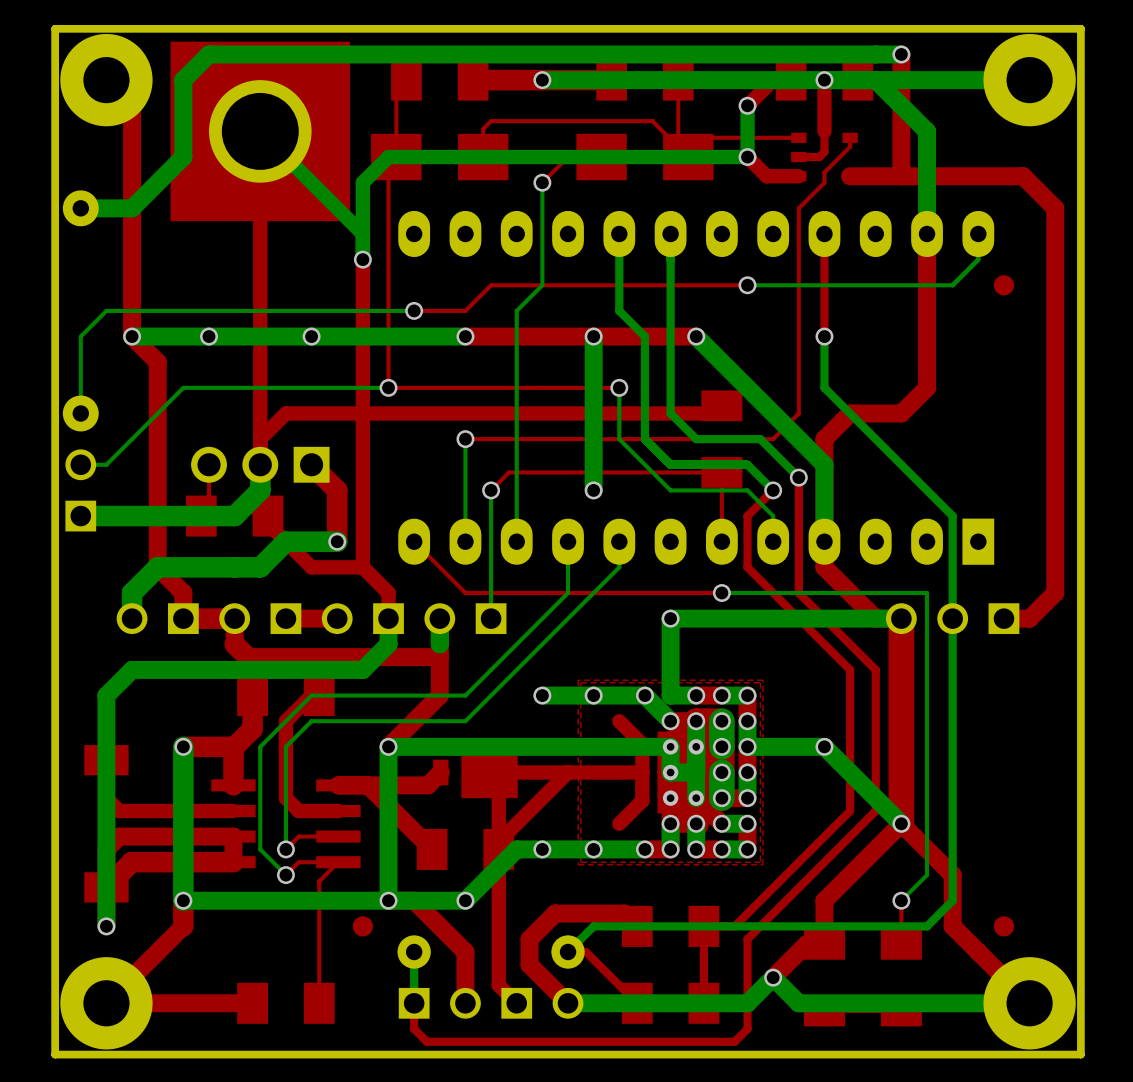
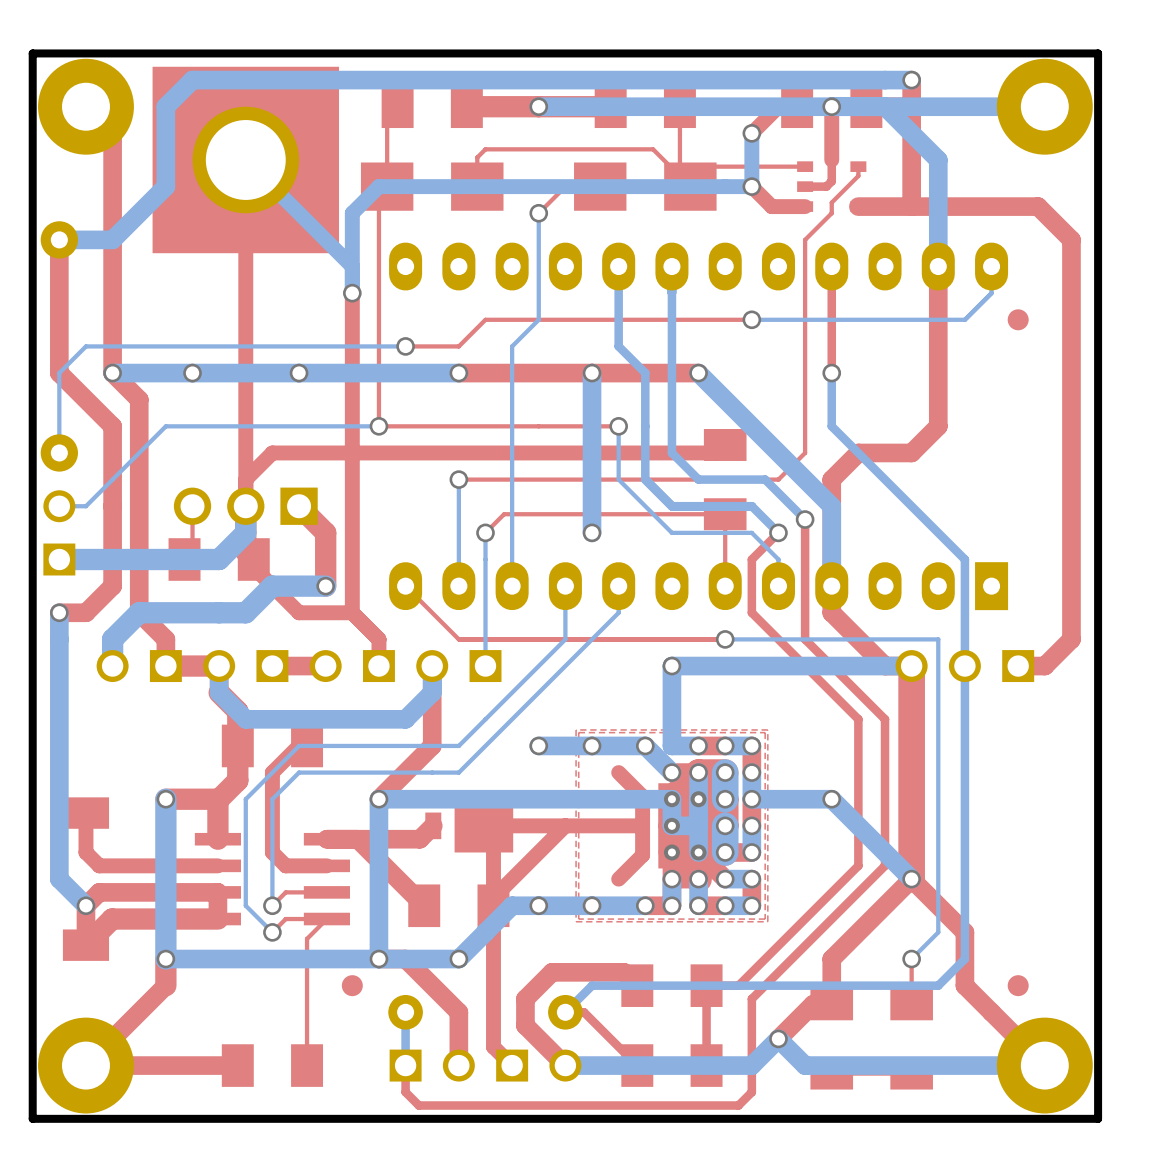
top track: none -> (59, 239) (59, 373) (112, 426) (112, 586) (85, 612) (59, 612)
bottom track: none -> (59, 612) (59, 879) (85, 905)
via: none -> (59, 612)
bottom track: (388, 618) (388, 644) (362, 669) -> (432, 692) (405, 719) (352, 719)
top track: (234, 644) (247, 657) (439, 657) -> none
bottom track: (260, 669) (132, 669) (106, 695) (106, 926) -> (245, 719) (219, 692) (219, 666)
via position: (106, 926) -> (85, 905)

